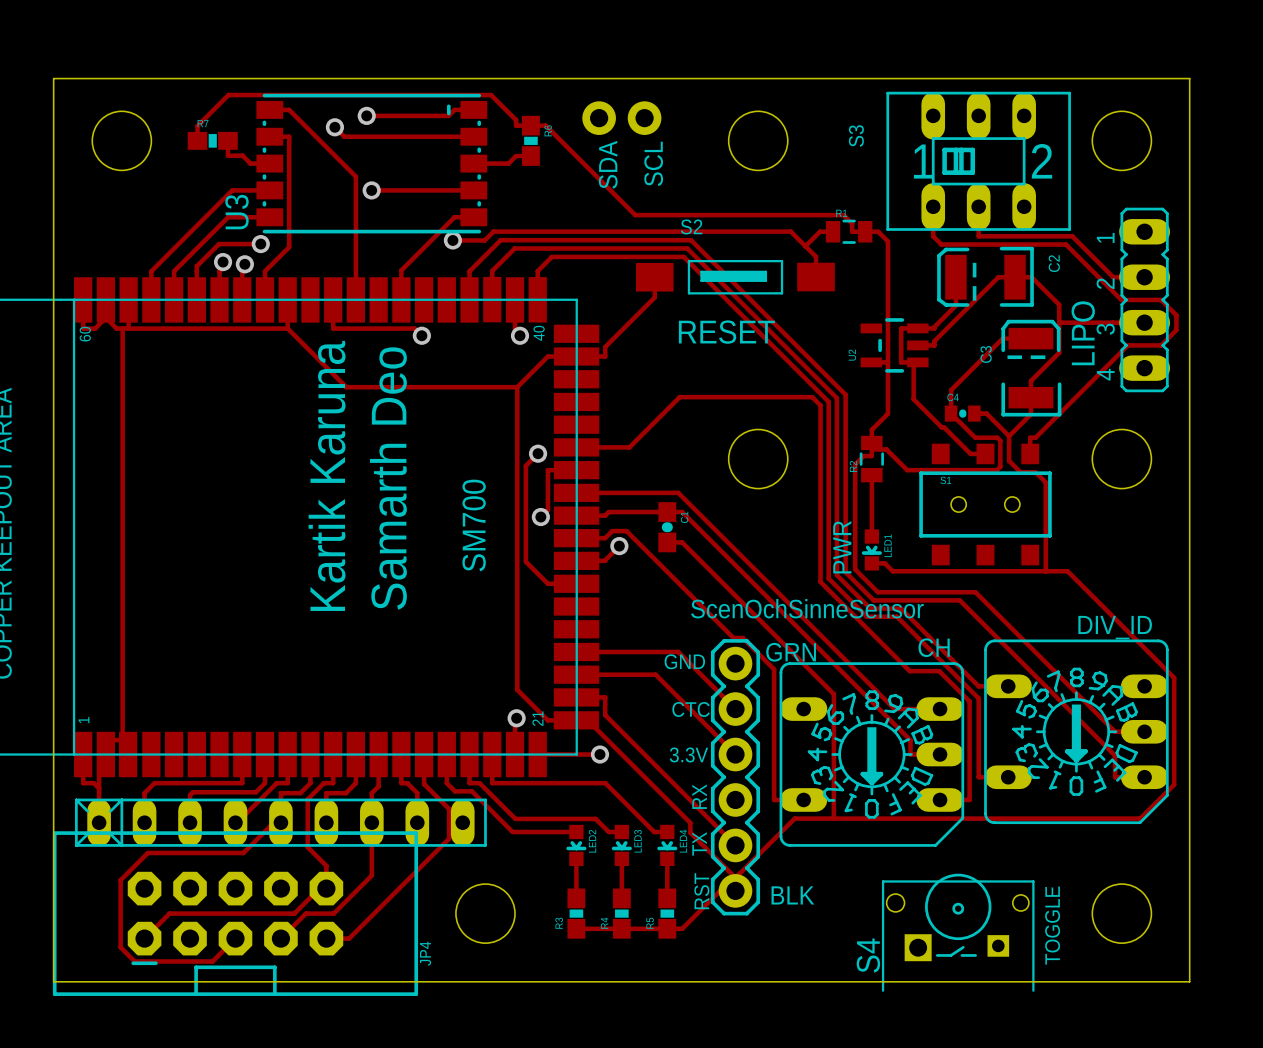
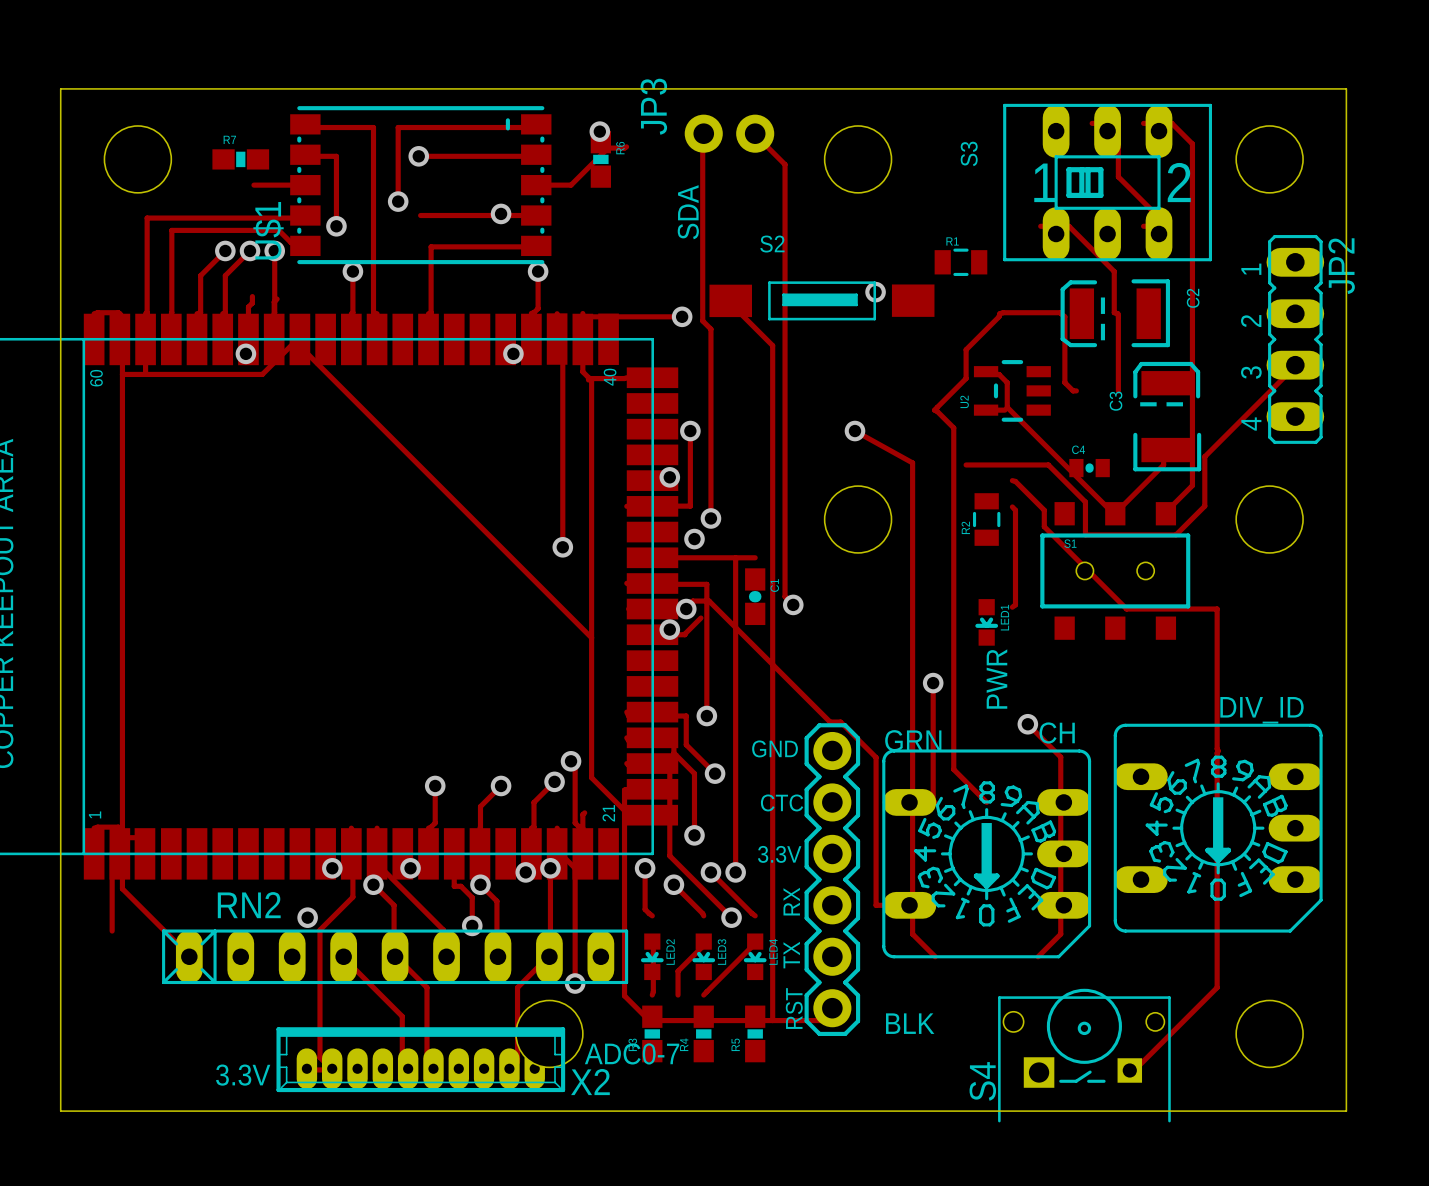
track: (269, 109) (289, 109) (355, 176) (355, 299) -> (305, 124) (307, 127) (373, 127) (373, 312) (377, 313)
track: (473, 109) (454, 109) (448, 115) (366, 115) -> (536, 124) (533, 127) (398, 127) (398, 201)
track: none -> (1092, 123) (1118, 123) (1118, 176) (1167, 226) (1143, 226)
via: (366, 115) -> none
via: none -> (599, 131)
track: none -> (703, 133) (702, 320) (710, 329) (710, 518)
part: (621, 118) -> none
JP3: none -> (729, 133)
track: none -> (755, 133) (785, 164) (785, 596) (793, 604)
track: (334, 127) (344, 136) (473, 136) -> (418, 156) (533, 156) (536, 154)
via: (334, 127) -> none
track: (269, 136) (289, 136) (289, 247) (265, 271) (265, 299) -> (305, 154) (336, 156) (336, 226)
via: none -> (418, 156)
track: (197, 140) (197, 126) (228, 95) (491, 95) (516, 120) (516, 125) (545, 125) (635, 215) (843, 215) (852, 223) (852, 231) (878, 231) (887, 241) (887, 413) (871, 429) (871, 456) (863, 456) (855, 464) (855, 569) (877, 592) (975, 592) (1115, 731) (1144, 731) -> none
track: (227, 140) (227, 155) (242, 155) (250, 163) -> (253, 185) (283, 185)
track: (530, 156) (516, 156) (508, 163) (504, 163) -> (626, 146) (608, 148) (571, 185)
text: SCL (653, 163) -> none
text position: SDA (608, 164) -> SDA (688, 212)
via: none -> (501, 213)
track: (269, 190) (232, 190) (151, 271) (151, 299) -> (305, 215) (303, 218) (147, 218) (147, 312) (145, 313)
via position: (371, 190) -> (398, 201)
via: none -> (336, 226)
track: none -> (1040, 226) (1068, 226) (1114, 271) (1114, 312) (1117, 313) (1118, 316) (1118, 390)
track: (933, 206) (933, 236) (941, 244) (1065, 244) (1121, 299) (1161, 299) (1176, 315) (1176, 330) (1161, 345) (1127, 345) (1035, 437) (1030, 437) (1030, 453) -> (1143, 123) (1171, 123) (1192, 143) (1192, 485) (1165, 513)
track: (978, 206) (978, 236) (1072, 236) (1113, 277) (1144, 277) -> none
U3 name: U3 (236, 212) -> U$1 (268, 230)
track: (269, 217) (228, 217) (174, 271) (174, 299) -> (305, 245) (303, 242) (291, 242) (278, 230) (171, 230) (171, 313)
track: (473, 217) (454, 217) (401, 270) (401, 299) -> (536, 245) (431, 246) (431, 312) (428, 313)
track: none -> (225, 250) (200, 275) (200, 312) (197, 313)
via: none -> (225, 250)
track: none -> (250, 250) (225, 275) (225, 312) (222, 313)
via: none -> (250, 250)
track: none -> (274, 250) (274, 313)
via: none -> (274, 250)
track: (833, 231) (819, 231) (805, 246) -> none
JP2 name: none -> JP2 (1341, 266)
track: none -> (352, 271) (352, 312) (351, 313)
via: none -> (352, 271)
track: none -> (538, 271) (538, 308) (531, 313)
track: (452, 240) (484, 240) (493, 231) (790, 231) (816, 256) (816, 277) -> none
via position: (452, 240) -> (538, 271)
track: (260, 244) (219, 244) (196, 266) (196, 299) -> none
via: (260, 244) -> none
via: none -> (875, 292)
via: (223, 262) -> none
via: (244, 264) -> none
track: none -> (730, 300) (731, 304) (772, 345) (772, 1020)
track: none -> (94, 313) (118, 312) (122, 316) (122, 827) (119, 828)
track: none -> (557, 313) (562, 320) (562, 547)
track: none -> (582, 313) (583, 316) (682, 316)
track: (654, 277) (654, 297) (605, 347) (605, 356) (547, 356) (517, 387) -> none
S2 position: (735, 277) -> (821, 300)
track: (955, 277) (955, 305) (934, 328) (901, 328) (901, 362) (917, 362) -> none
via: none -> (682, 316)
track: (83, 299) (83, 328) (95, 328) (105, 317) (116, 328) (287, 328) (287, 299) -> none
track: (333, 299) (333, 328) (414, 328) (421, 335) -> none
track: (469, 299) (469, 271) (500, 240) (691, 240) (845, 394) (845, 572) (873, 600) (959, 600) (1115, 755) (1115, 777) (1144, 777) -> none
track: (492, 299) (492, 270) (514, 248) (687, 248) (836, 398) (836, 575) (870, 608) (900, 608) (978, 686) (1008, 686) -> none
track: (537, 299) (537, 271) (551, 256) (683, 256) (828, 401) (828, 578) (866, 616) (897, 616) (978, 698) (978, 777) (1008, 777) -> none
via: none -> (245, 353)
via: none -> (513, 353)
track: (1059, 322) (1144, 322) -> (966, 464) (1048, 464) (1085, 502) (1085, 534) (1175, 534) (1204, 506) (1204, 456) (1295, 365)
track: (122, 328) (122, 740) -> none
track: none -> (325, 371) (295, 341) (262, 374) (122, 374)
track: none -> (987, 371) (990, 374) (999, 374) (1007, 382) (1007, 407) (1114, 514) (1163, 464) (1163, 448) (1166, 444)
S2 value: RESET (726, 332) -> none
track: none -> (626, 377) (591, 378) (591, 777) (624, 810)
JP2 value: LIPO (1083, 333) -> none
via: (421, 335) -> none
via: (520, 335) -> none
track: (1030, 338) (1002, 338) (951, 390) (951, 413) (975, 437) (997, 437) (1000, 440) (1000, 466) (996, 470) (907, 470) (886, 449) (871, 449) -> none
track: (917, 345) (934, 345) (934, 341) (998, 277) (1031, 277) (1059, 304) (1059, 352) (1030, 381) (1030, 414) (1009, 436) -> none
track: none -> (1076, 390) (1073, 390) (1064, 382) (1064, 316) (1060, 312) (1003, 312) (999, 313) (999, 316) (966, 349) (966, 378) (934, 410) (953, 427) (953, 769) (986, 802)
track: (913, 362) (913, 399) (970, 453) (985, 453) -> none
track: none -> (690, 431) (690, 506) (626, 506)
via: none -> (690, 431)
track: none -> (854, 431) (912, 462) (912, 934) (935, 956)
via: none -> (854, 431)
track: (346, 387) (517, 387) -> (391, 438) (591, 637)
track: (517, 387) (517, 689) (547, 720) (587, 720) (690, 822) (690, 832) (735, 877) (794, 818) (1140, 818) (1174, 784) (1174, 677) (1067, 571) (892, 571) (884, 563) (871, 563) -> none
track: (974, 413) (986, 413) (1009, 436) -> none
via: none -> (669, 477)
track: none -> (1012, 480) (1015, 481) (1044, 510) (1044, 526) (1126, 609) (1217, 609) (1217, 987) (1137, 1067)
track: (1009, 436) (1009, 460) (1020, 472) (1035, 472) (1045, 482) (1045, 571) -> none
track: (576, 447) (629, 447) (679, 397) (812, 397) (820, 405) (820, 581) (909, 671) (939, 671) (969, 701) (969, 799) (940, 799) -> none
track: none -> (1012, 506) (1015, 510) (1015, 604) (1012, 607)
track: (538, 453) (525, 465) (525, 561) (547, 583) (576, 583) -> none
via: (538, 453) -> none
via: none -> (710, 518)
track: (576, 470) (547, 470) (547, 509) (540, 517) -> none
text: Kartik Karuna (327, 475) -> none
track: (871, 475) (871, 536) -> none
via: none -> (694, 539)
text: Samarth Deo (388, 478) -> none
via: none -> (562, 547)
track: none -> (735, 557) (735, 872)
track: (667, 492) (678, 492) (894, 709) (940, 709) -> none
track: none -> (626, 583) (706, 584) (706, 716)
track: (576, 515) (605, 515) (608, 512) (682, 512) (910, 740) (910, 754) (940, 754) -> none
via: (540, 517) -> none
text: SM700 (474, 525) -> none
via: none -> (793, 604)
track: (667, 542) (682, 542) (833, 694) (833, 818) -> none
via position: (619, 546) -> (686, 609)
text rotation: 0° (842, 547) -> 0.1° clockwise (996, 679)
text position: PWR (842, 547) -> PWR (996, 679)
via: none -> (669, 629)
track: none -> (933, 683) (933, 802) (935, 802)
via: none -> (933, 683)
text: ScenOchSinneSensor (807, 608) -> none
track: none -> (626, 712) (628, 716) (686, 716) (686, 744) (715, 773)
via: none -> (706, 716)
track: none -> (1027, 724) (1060, 757) (1060, 934) (1038, 956)
via: none -> (1027, 724)
track: none -> (626, 737) (628, 740) (673, 740) (673, 753) (694, 773) (694, 835)
track: (576, 651) (678, 651) (735, 709) -> none
text position: GRN (791, 652) -> GRN (913, 740)
track: none -> (571, 761) (575, 765) (575, 823) (582, 828)
via: none -> (571, 761)
track: none -> (626, 763) (628, 765) (669, 765) (669, 855) (731, 917)
track: (576, 674) (655, 674) (735, 754) -> none
via: none -> (715, 773)
track: none -> (554, 781) (533, 802) (533, 827) (531, 828)
via: none -> (554, 781)
track: none -> (435, 785) (435, 823) (428, 828)
via: none -> (435, 785)
track: none -> (501, 785) (480, 806) (479, 828)
via: none -> (501, 785)
track: (576, 697) (605, 697) (605, 715) (735, 845) -> none
via: (516, 718) -> none
track: none -> (94, 828) (119, 828)
track: none -> (119, 828) (122, 831) (122, 888) (189, 956)
track: none -> (351, 828) (352, 897) (319, 930) (319, 1057) (332, 1068) (306, 1068)
track: none -> (377, 828) (381, 835) (381, 868) (443, 930) (443, 954) (446, 956)
track: none -> (557, 828) (562, 835) (562, 855) (575, 868) (575, 983)
via: none -> (694, 835)
track: (83, 754) (83, 783) (93, 783) (99, 788) -> none
track: (242, 754) (242, 783) (154, 783) (144, 793) (144, 822) -> none
track: (265, 754) (265, 783) (255, 792) (192, 792) (190, 795) (190, 822) -> none
track: (287, 754) (287, 783) (276, 783) (235, 822) -> none
track: (310, 754) (310, 783) (300, 793) (280, 793) (280, 822) -> none
track: (333, 754) (333, 783) (323, 783) (307, 799) (307, 847) (326, 865) (326, 888) -> none
track: (355, 754) (355, 783) (345, 793) (326, 793) (326, 822) -> none
track: (378, 754) (378, 786) (371, 793) (371, 875) (333, 913) (305, 913) (280, 938) -> none
track: (424, 754) (424, 784) (449, 809) (449, 838) (349, 938) (326, 938) -> none
track: (446, 754) (446, 783) (455, 791) (471, 791) (512, 832) (576, 832) -> none
track: (469, 754) (469, 783) (479, 783) (515, 818) (595, 818) (608, 832) (621, 832) -> none
track: (492, 754) (492, 783) (605, 783) (654, 832) (667, 832) -> none
track: (537, 754) (599, 754) -> none
via: (599, 754) -> none
via: none -> (332, 868)
via: none -> (410, 868)
track: none -> (550, 868) (550, 954) (517, 987) (517, 1061) (509, 1068)
via: none -> (550, 868)
track: none -> (645, 868) (645, 909) (652, 915)
via: none -> (645, 868)
via: none -> (525, 872)
track: none -> (710, 872) (755, 915)
via: none -> (710, 872)
via: none -> (735, 872)
track: none -> (373, 884) (394, 905) (395, 956) (426, 987) (426, 1061) (433, 1068)
via: none -> (373, 884)
track: none -> (480, 884) (496, 901) (497, 956)
via: none -> (480, 884)
track: none -> (673, 884) (703, 915)
via: none -> (673, 884)
via: none -> (307, 917)
via: none -> (731, 917)
track: (280, 815) (243, 853) (147, 853) (120, 880) (120, 947) (134, 961) (212, 961) (235, 938) -> none
via: none -> (472, 925)
part: (280, 822) -> none
track: none -> (652, 946) (652, 995)
track: none -> (703, 946) (678, 971) (678, 995)
track: none -> (755, 946) (752, 946) (703, 995)
track: none -> (343, 956) (402, 1016) (402, 1061) (408, 1068)
RN2: none -> (395, 956)
track: (576, 858) (576, 898) -> none
track: (621, 858) (621, 898) -> none
track: (667, 858) (667, 898) -> none
via: none -> (575, 983)
track: (326, 888) (319, 888) (294, 913) (169, 913) (144, 938) -> none
track: (733, 890) (720, 890) (682, 928) (576, 928) -> (830, 1008) (830, 1020) (652, 1021) (624, 995) (624, 790) (626, 789)
text position: BLK (792, 895) -> BLK (910, 1023)
JP4: (235, 913) -> none
S4 value: TOGGLE (1052, 925) -> none
X2: none -> ADC0-7 (420, 1059)
text: none -> 3.3V (243, 1075)

